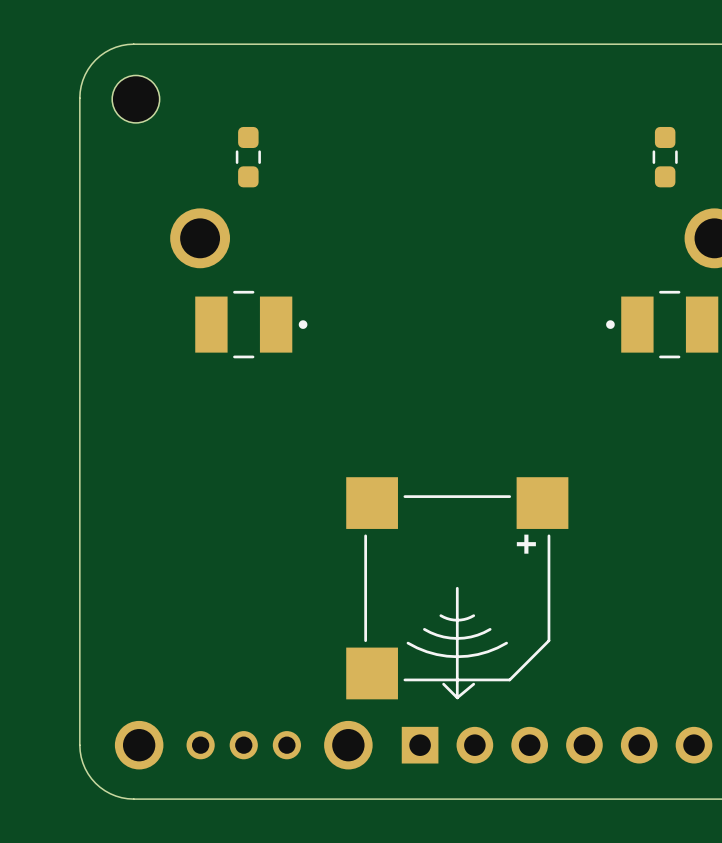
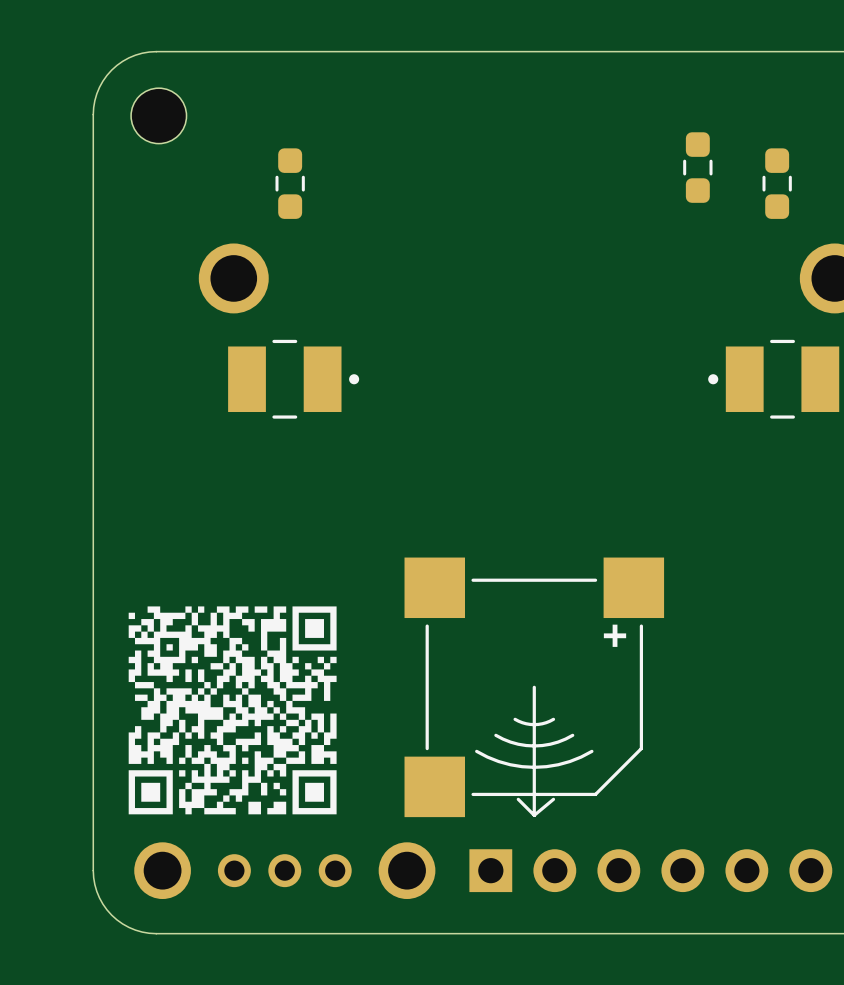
part: none -> (697, 167)
drawing: none -> [128, 606, 337, 815]

